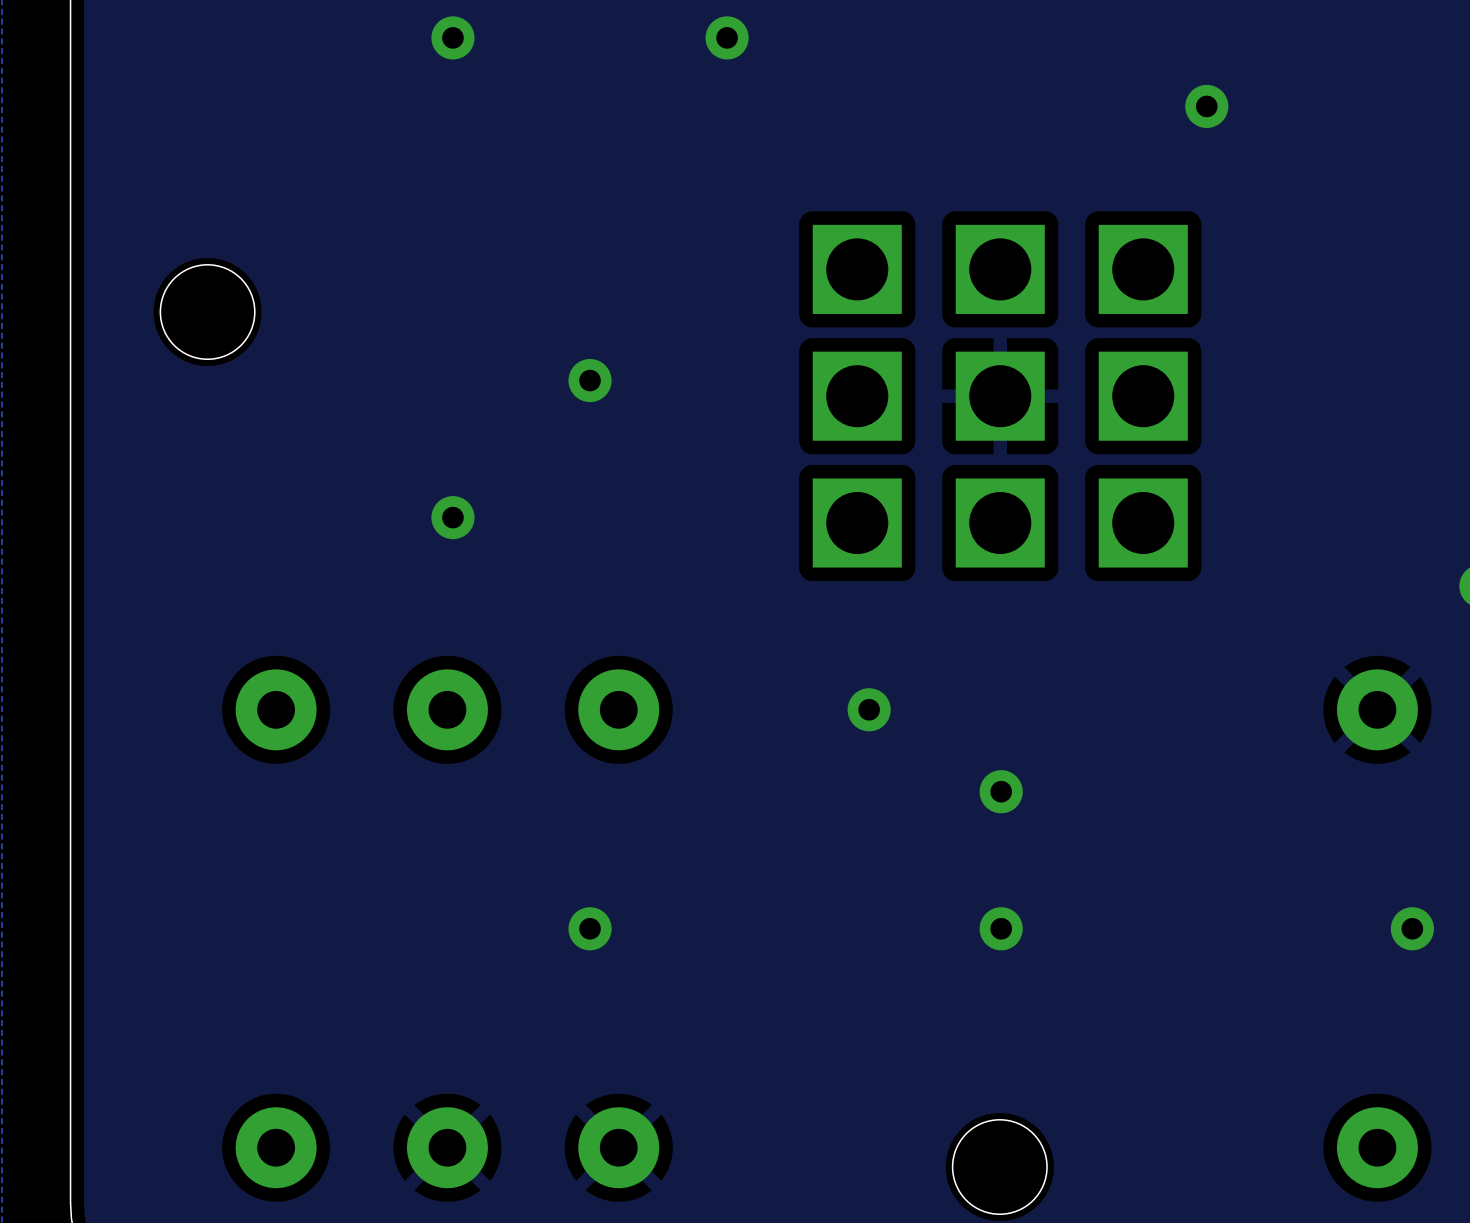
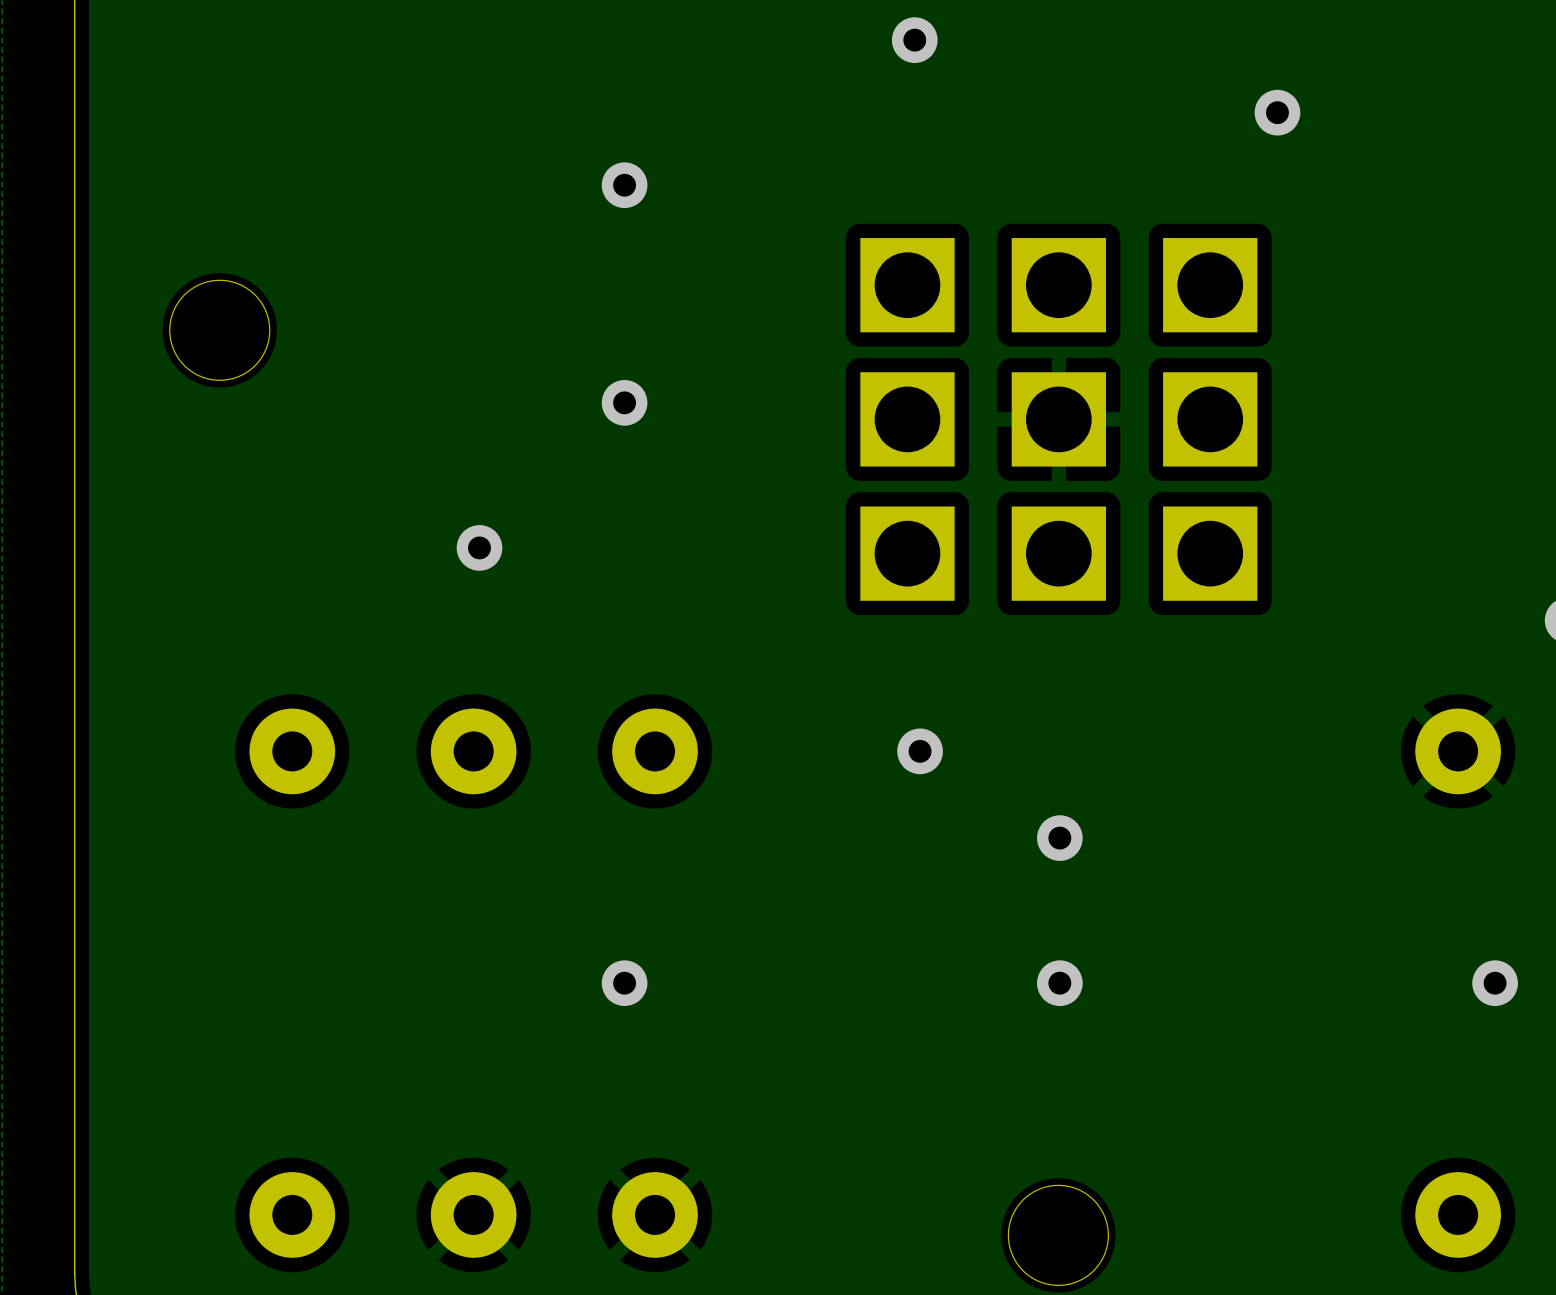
via: (452, 37) -> none
via: (727, 37) -> none
via: none -> (914, 40)
via: none -> (624, 185)

